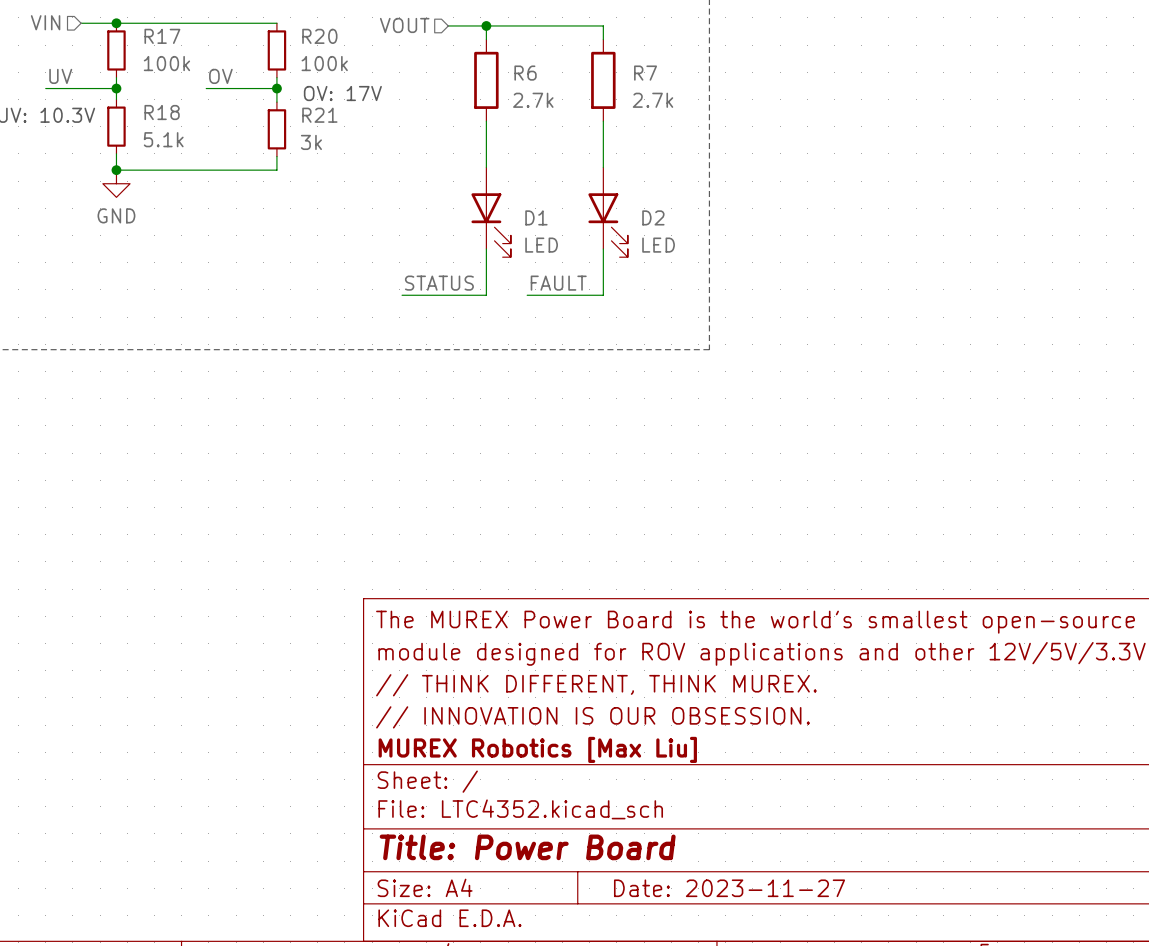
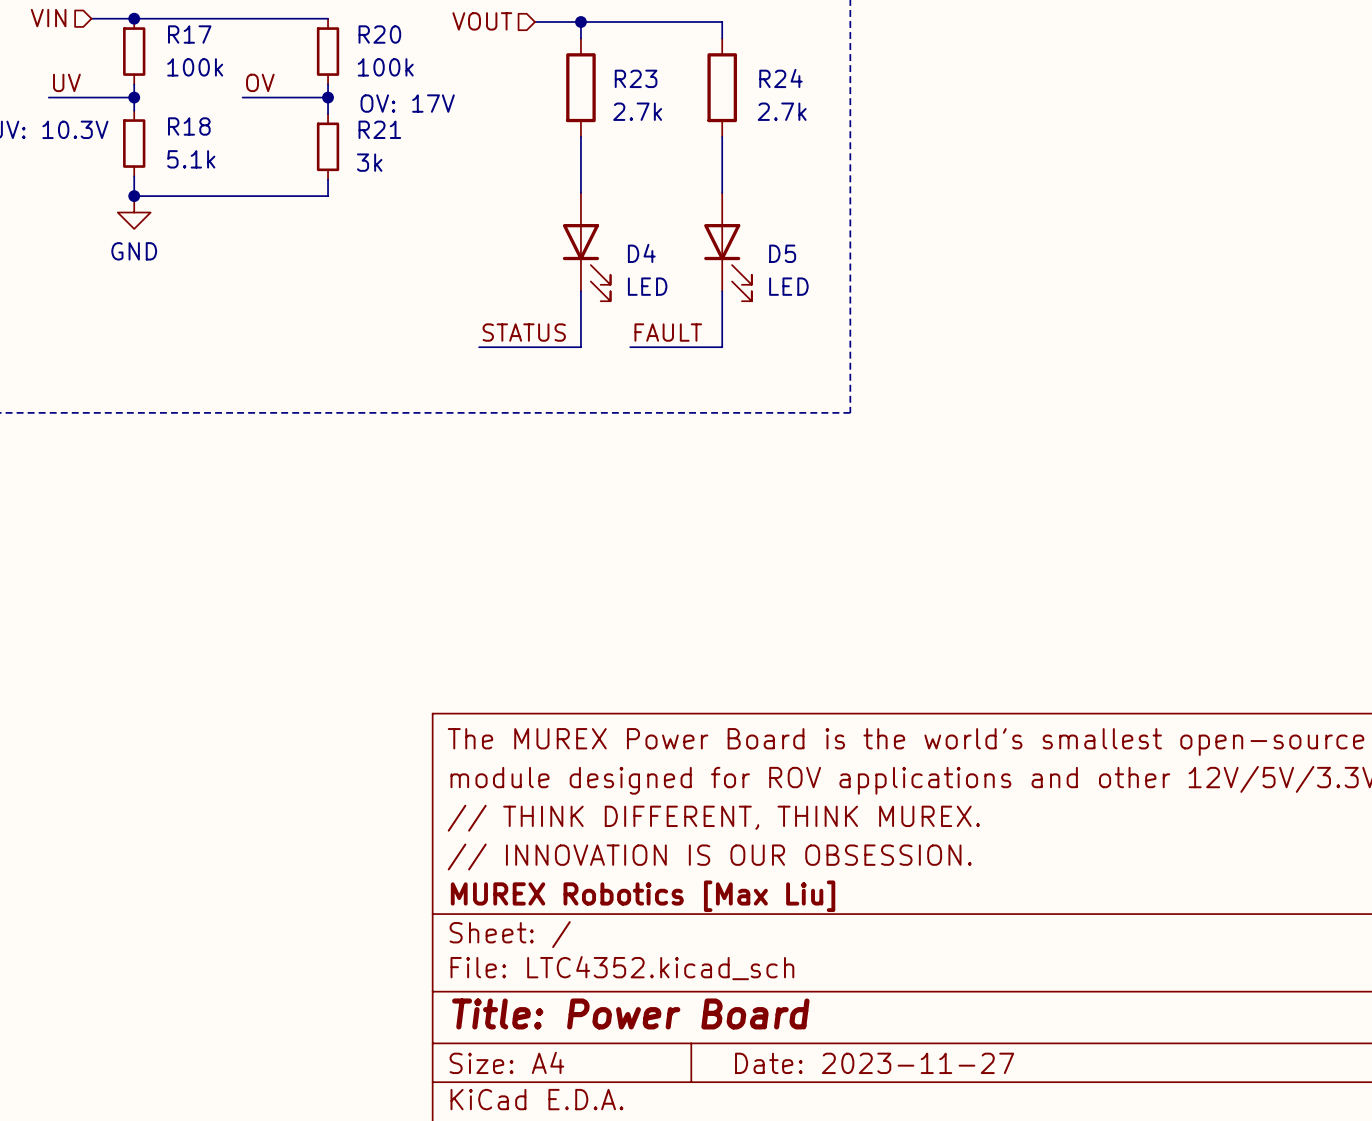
R6 name: R6 (525, 73) -> R23 (636, 78)
R7 name: R7 (645, 73) -> R24 (780, 78)
D1 name: D1 (536, 217) -> D4 (641, 253)
D2 name: D2 (653, 217) -> D5 (782, 253)

